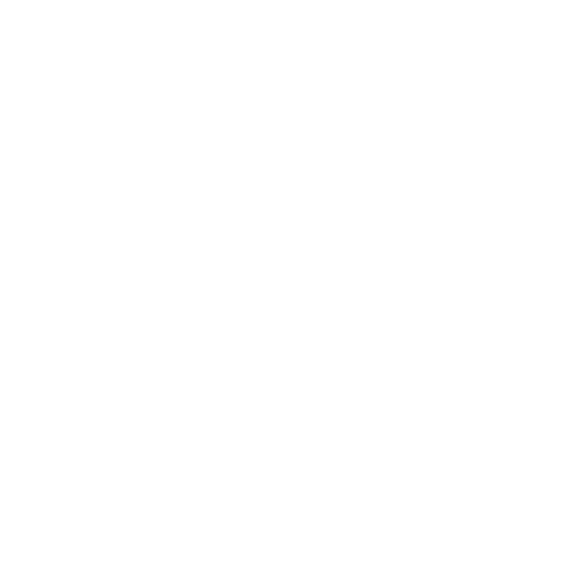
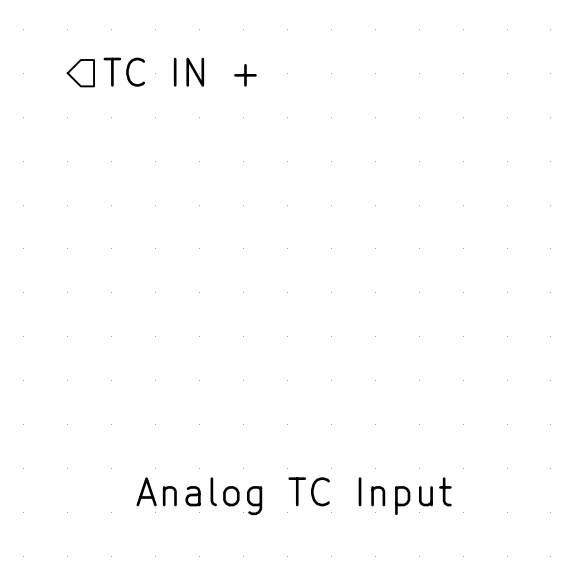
hierarchical label: none -> TC IN + (180, 72)
text: none -> Analog TC Input (294, 496)

